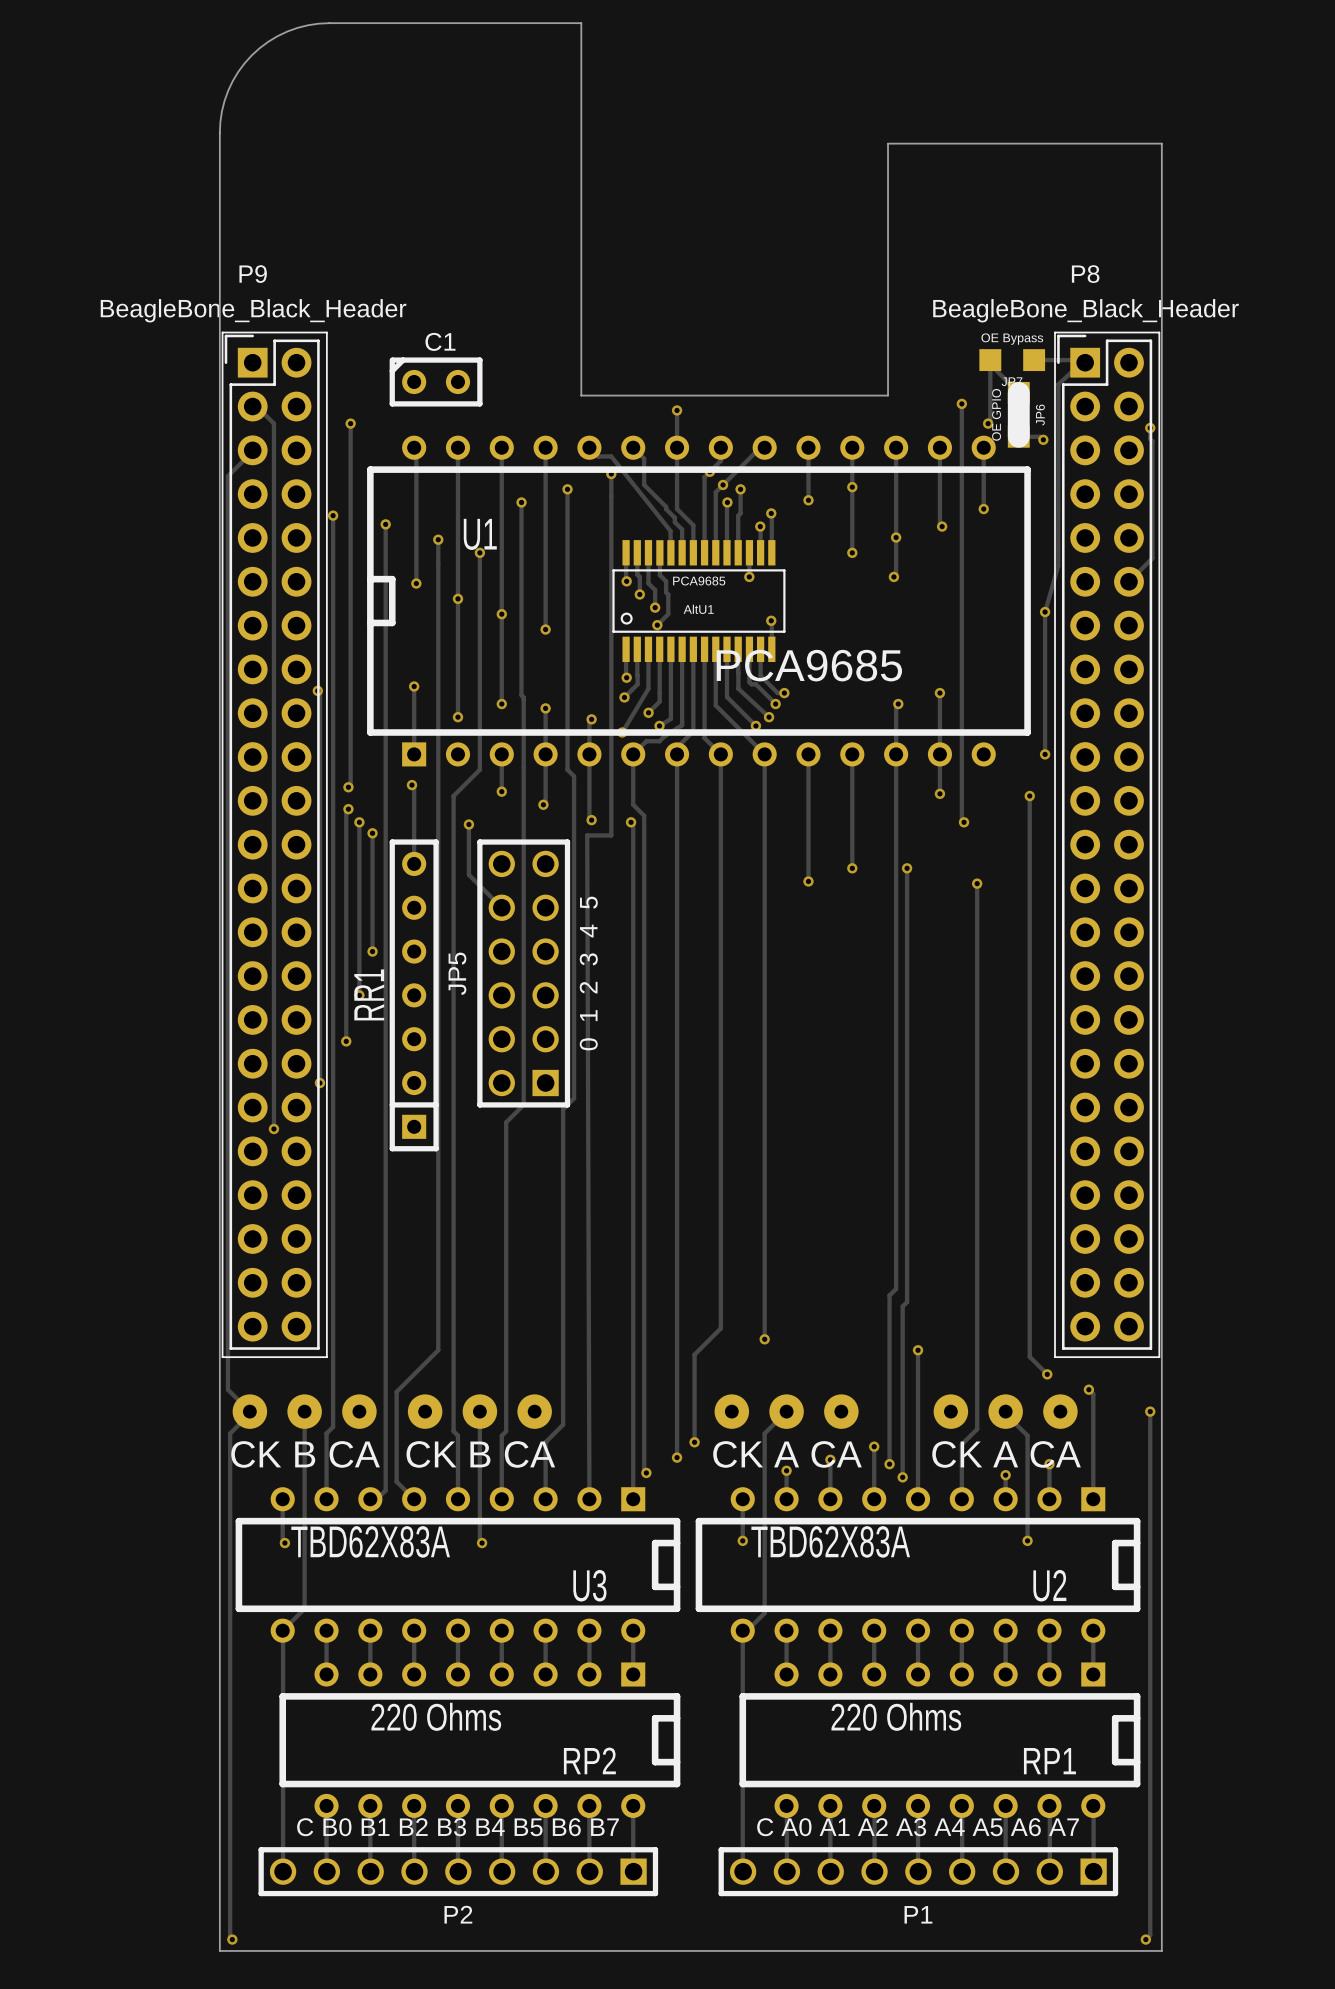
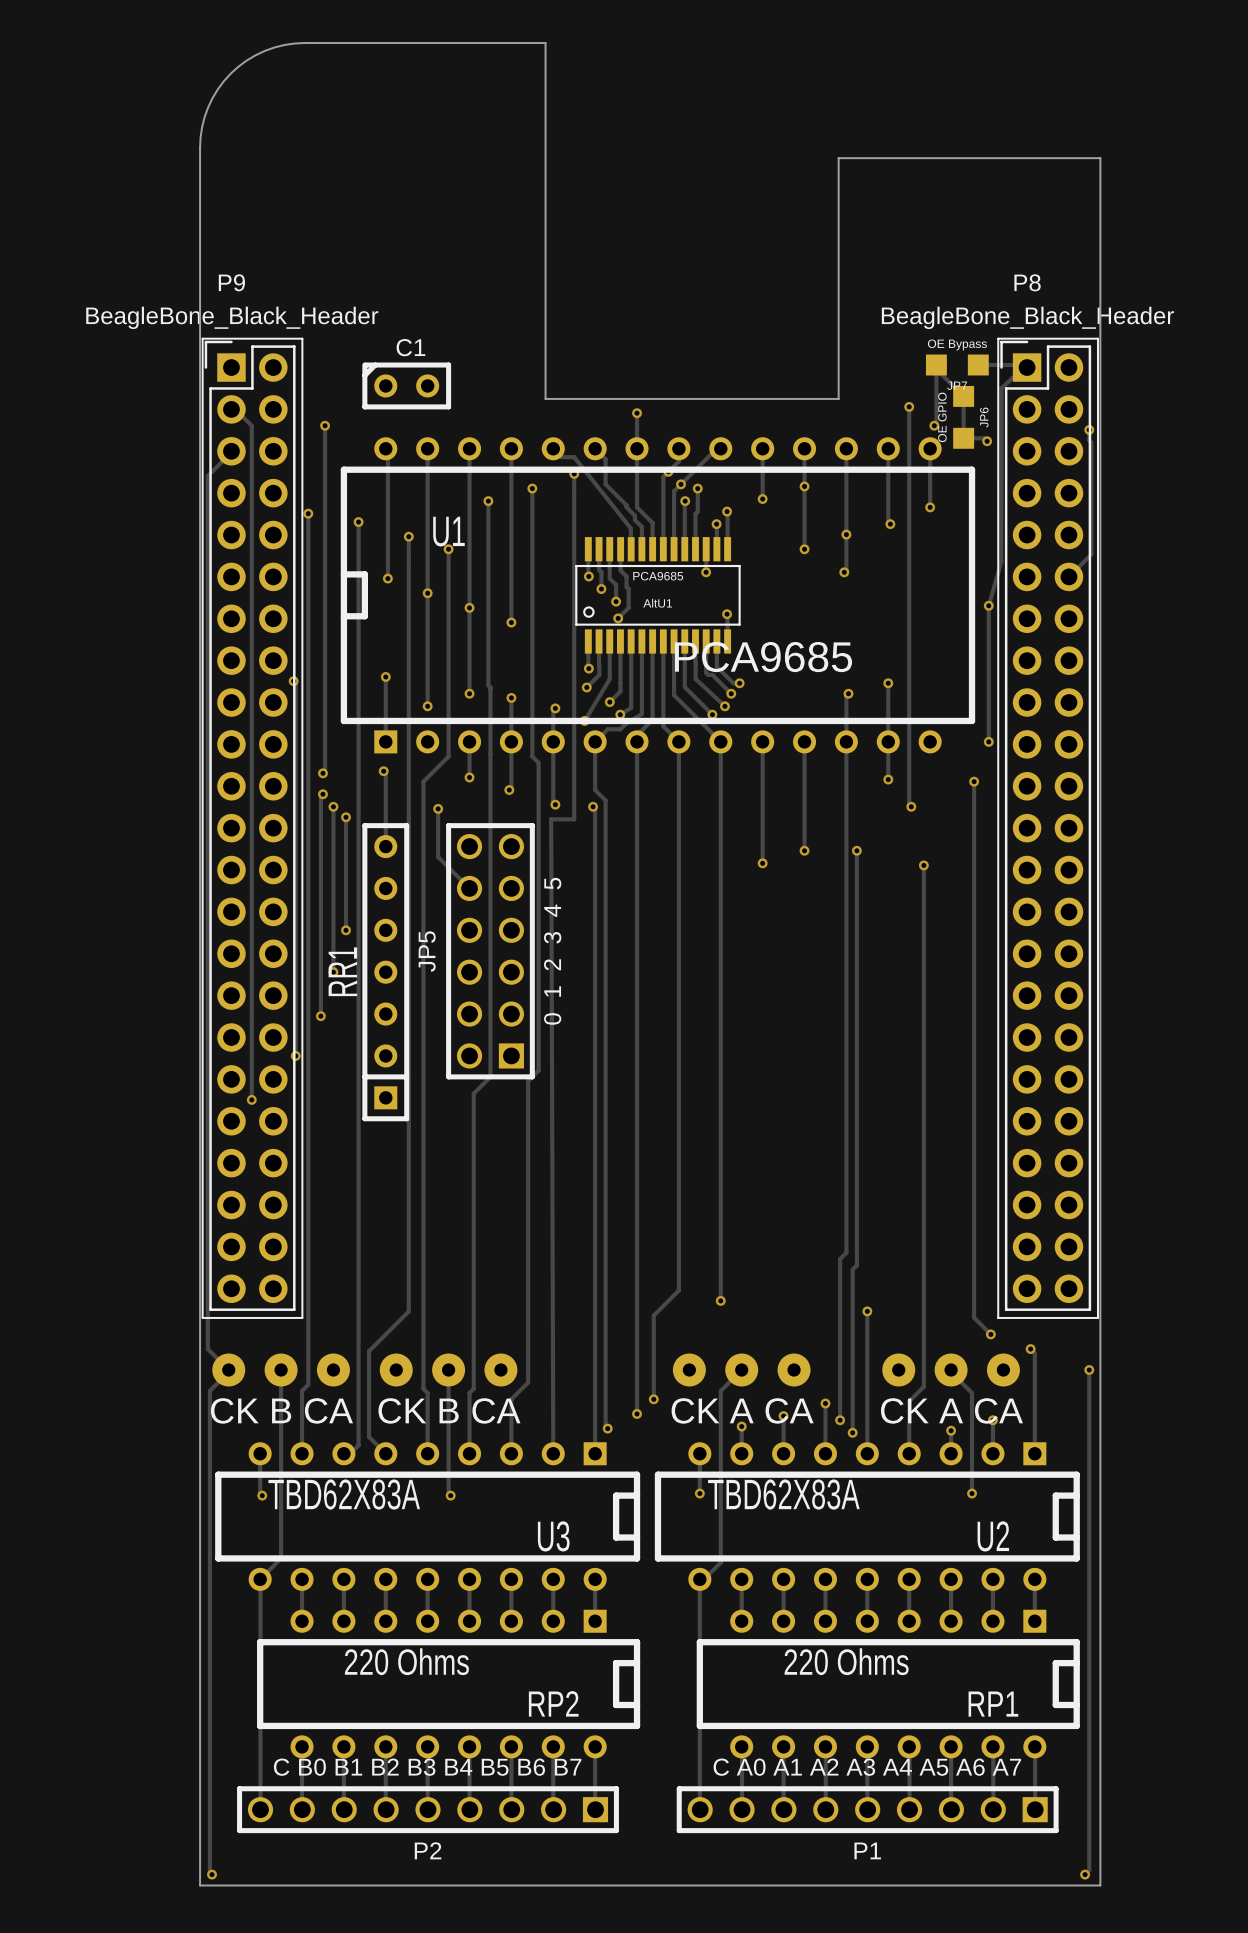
JP6 footprint: [1007, 381, 1030, 448] -> [953, 385, 975, 449]

